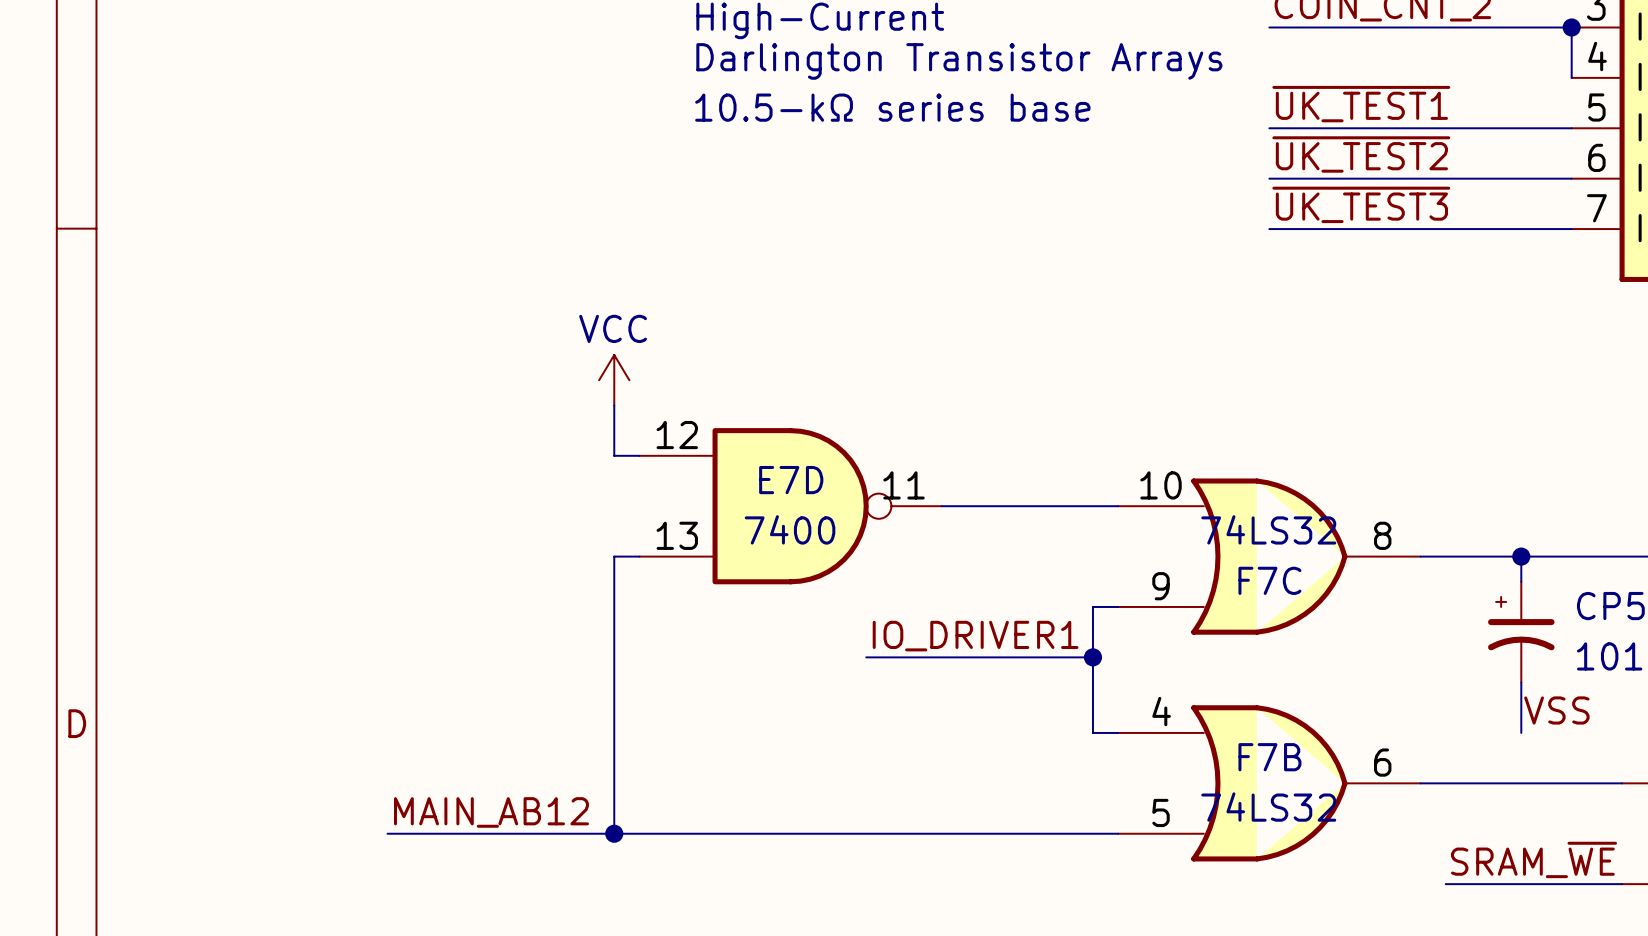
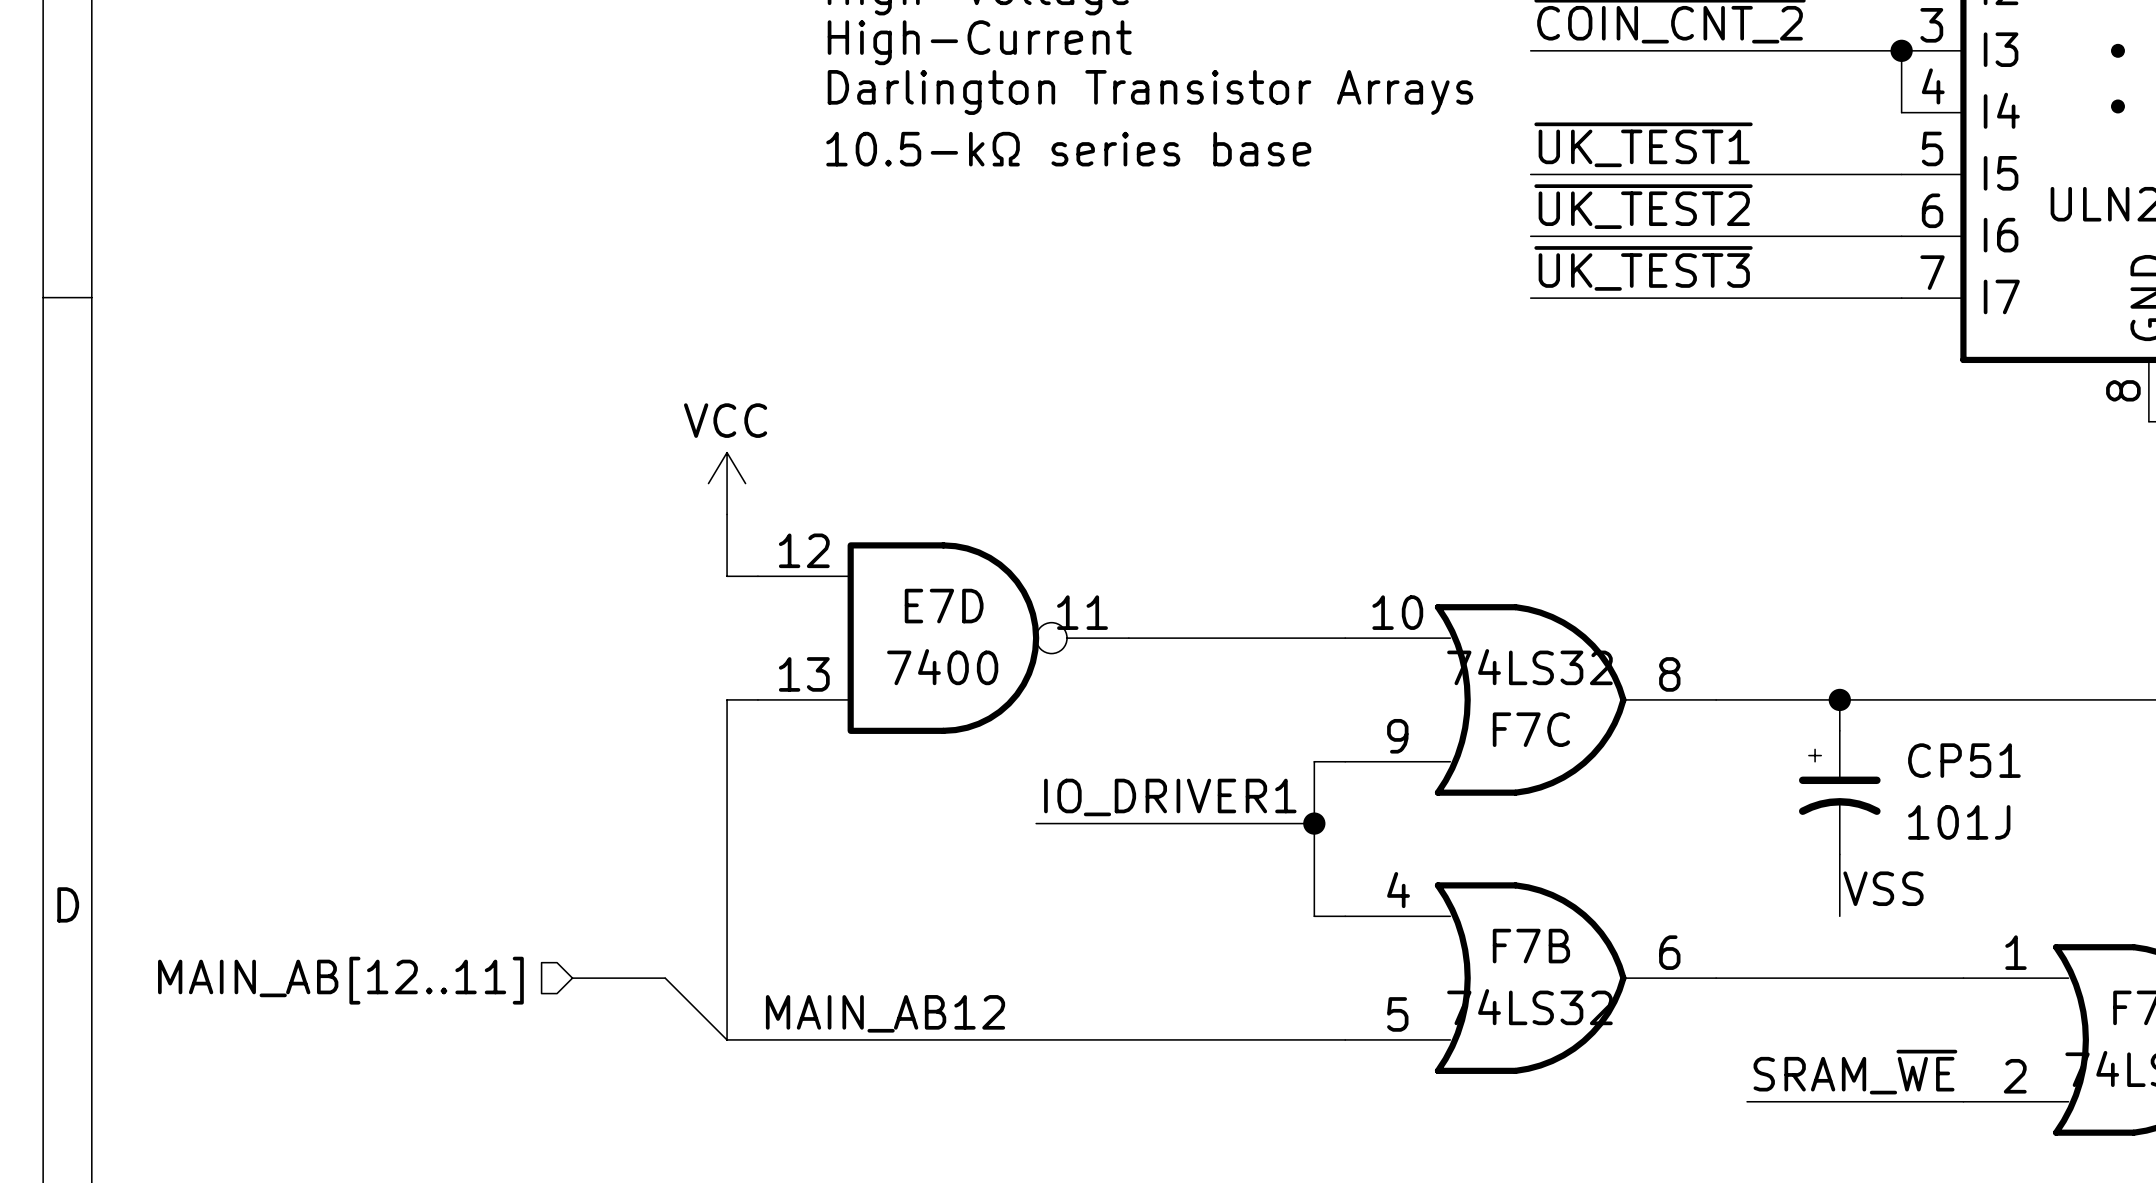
bus: none -> (572, 978) (665, 978)
hierarchical label: none -> MAIN_AB[12..11] (340, 980)
label position: MAIN_AB12 (491, 812) -> MAIN_AB12 (885, 1013)
wire: (387, 833) (614, 833) -> (665, 978) (727, 1039)
junction: (614, 833) -> none

